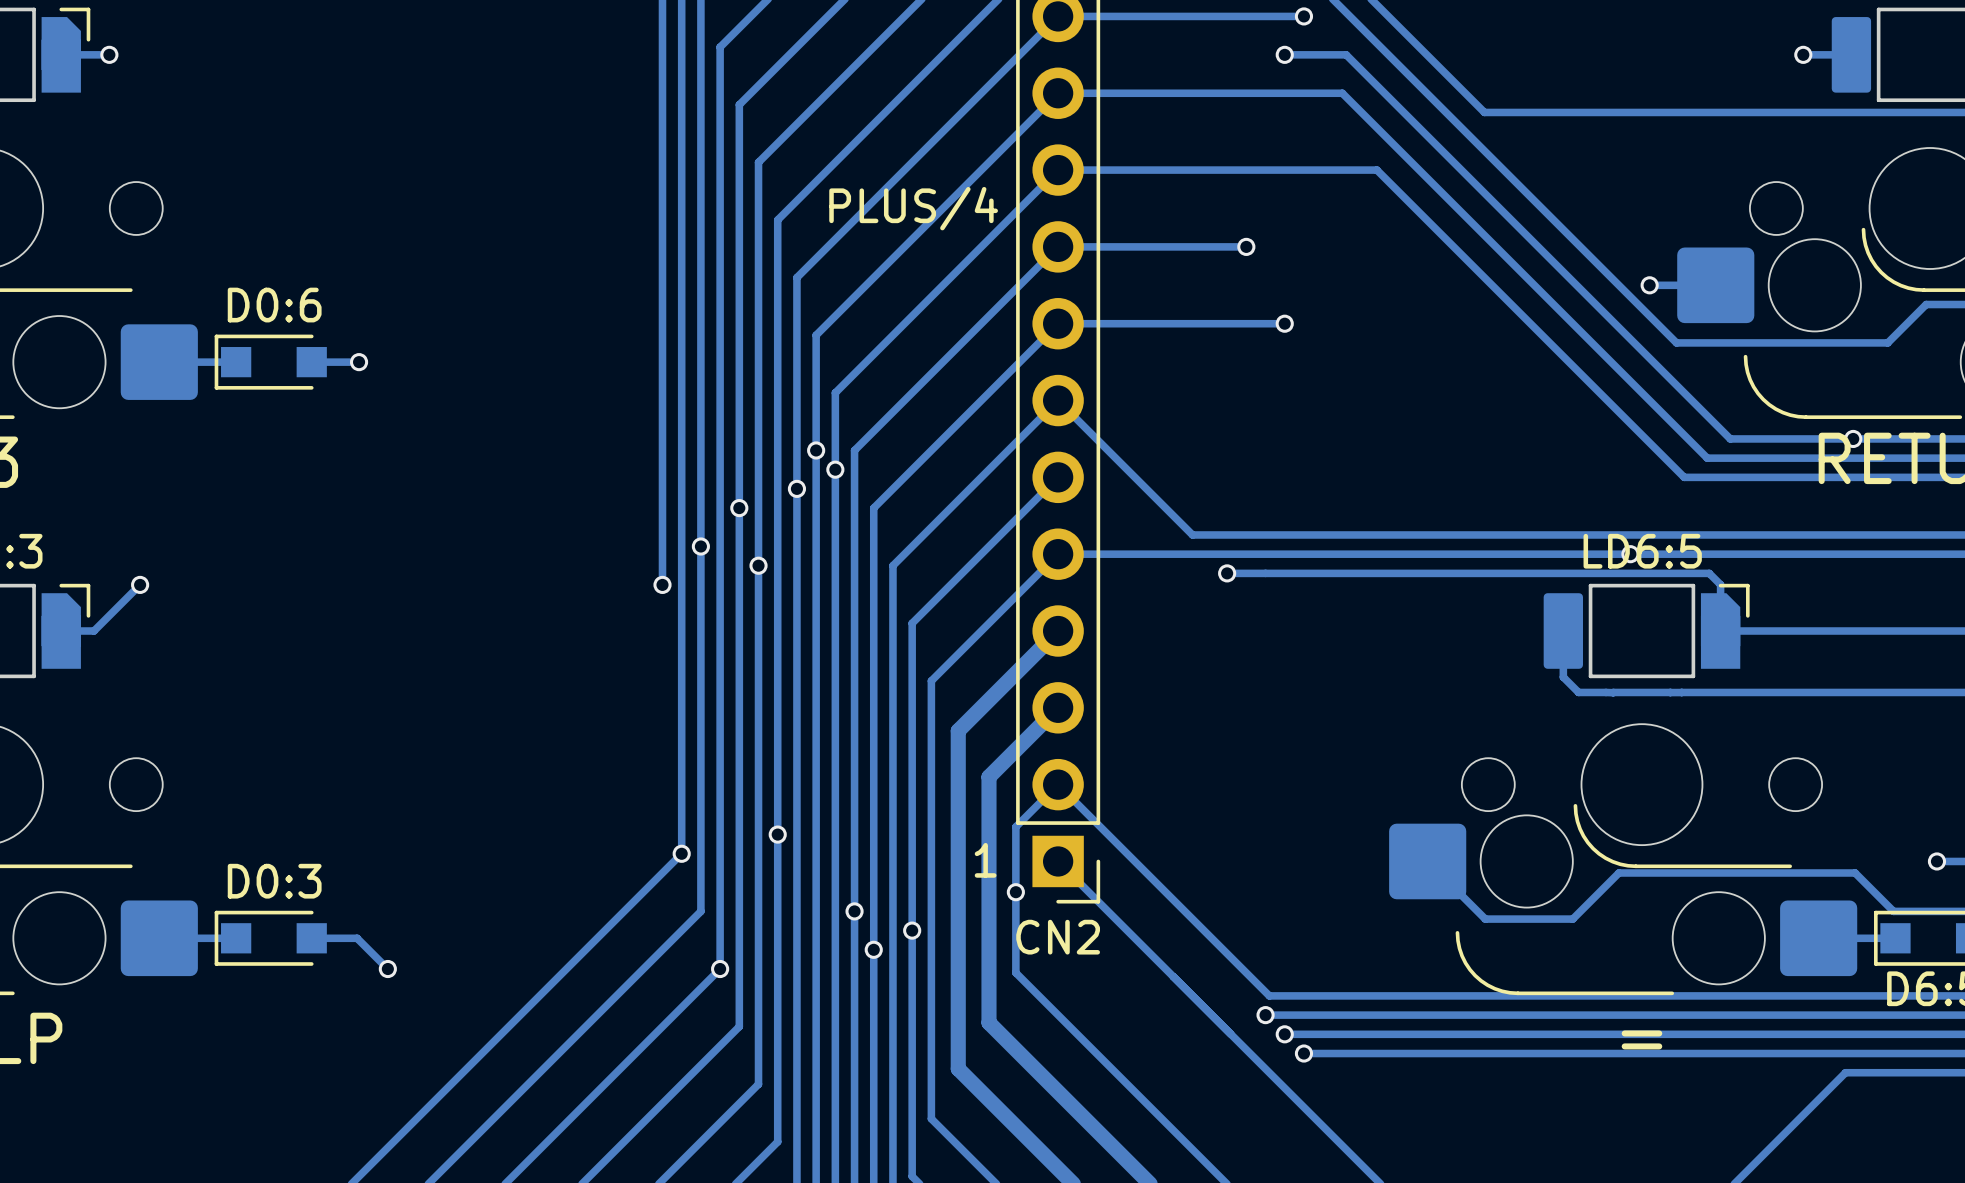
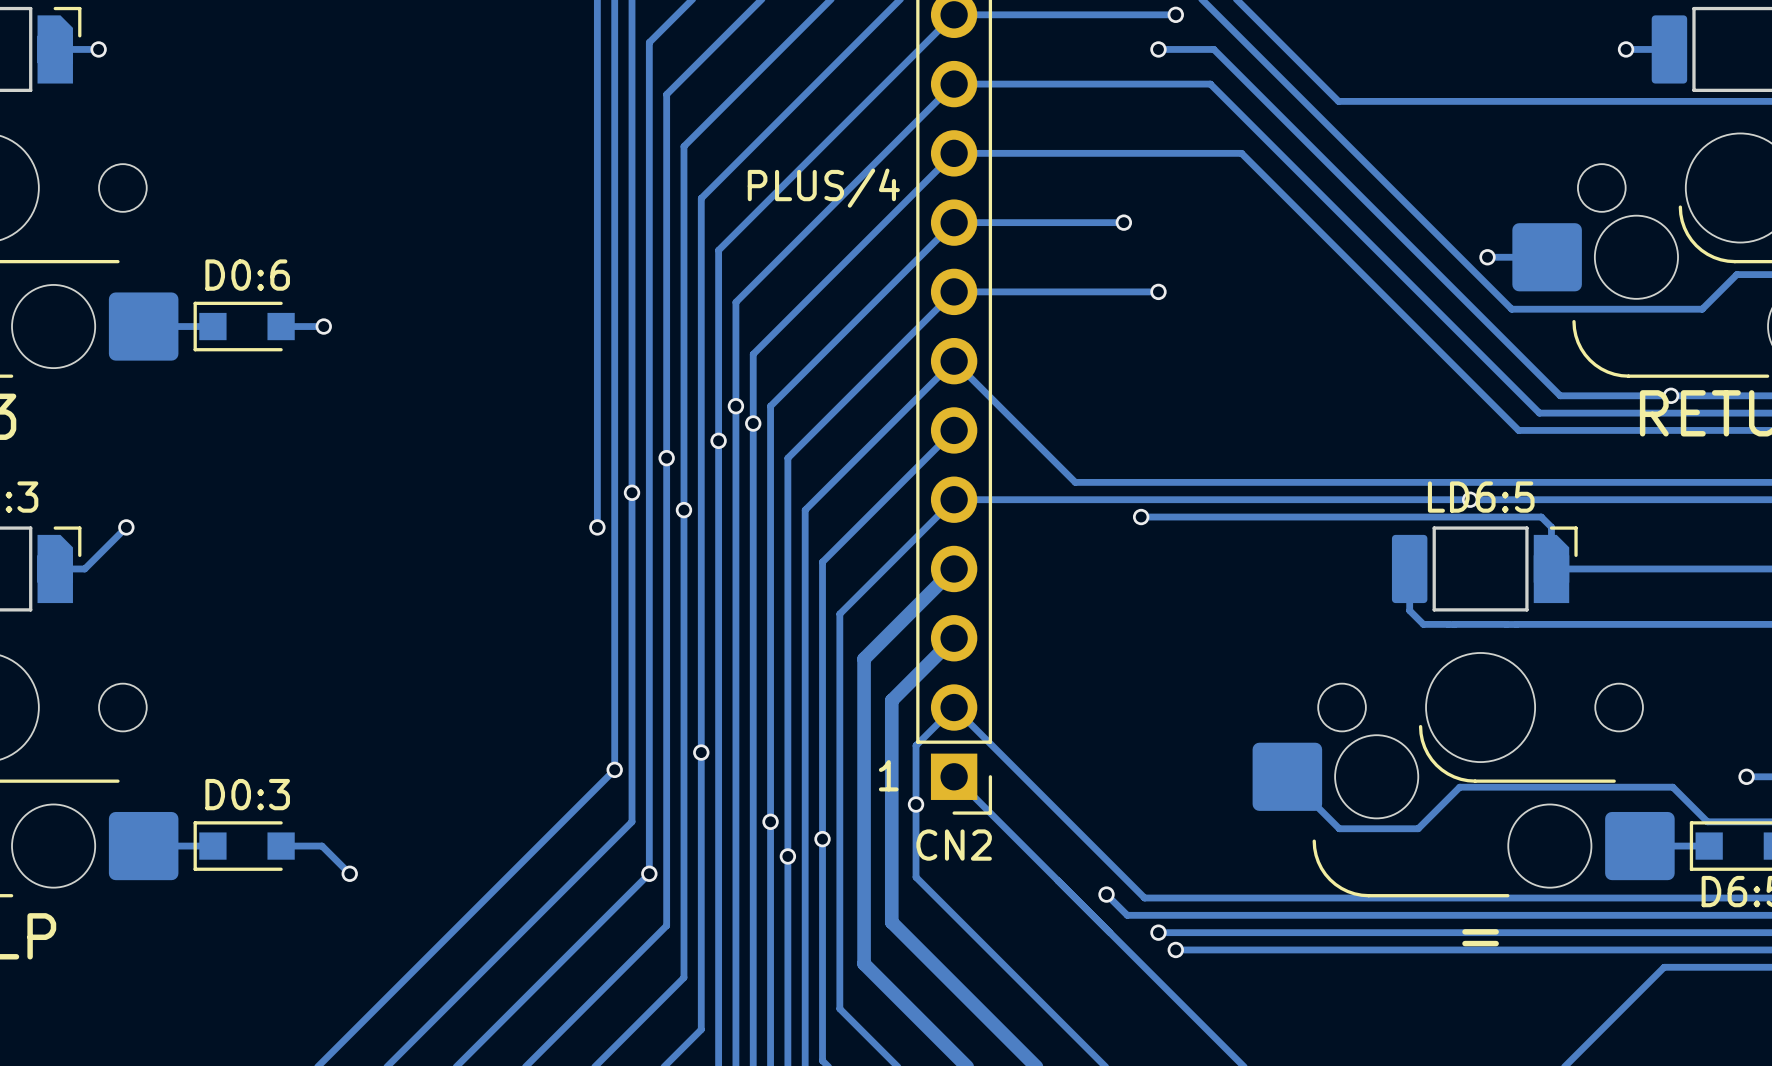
via position: (1227, 573) -> (1141, 517)
track: (1265, 573) (1227, 573) -> none
track: none -> (1106, 894) (1127, 915) (1141, 915)
via position: (1265, 1015) -> (1106, 894)

